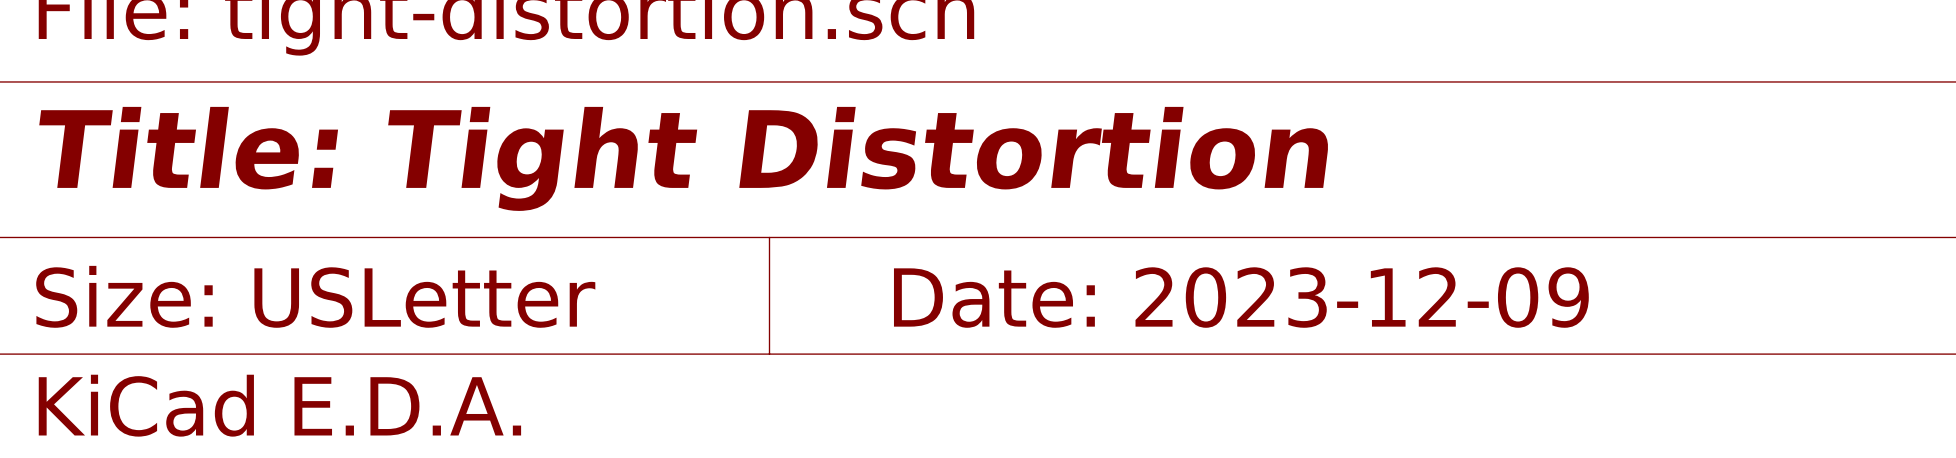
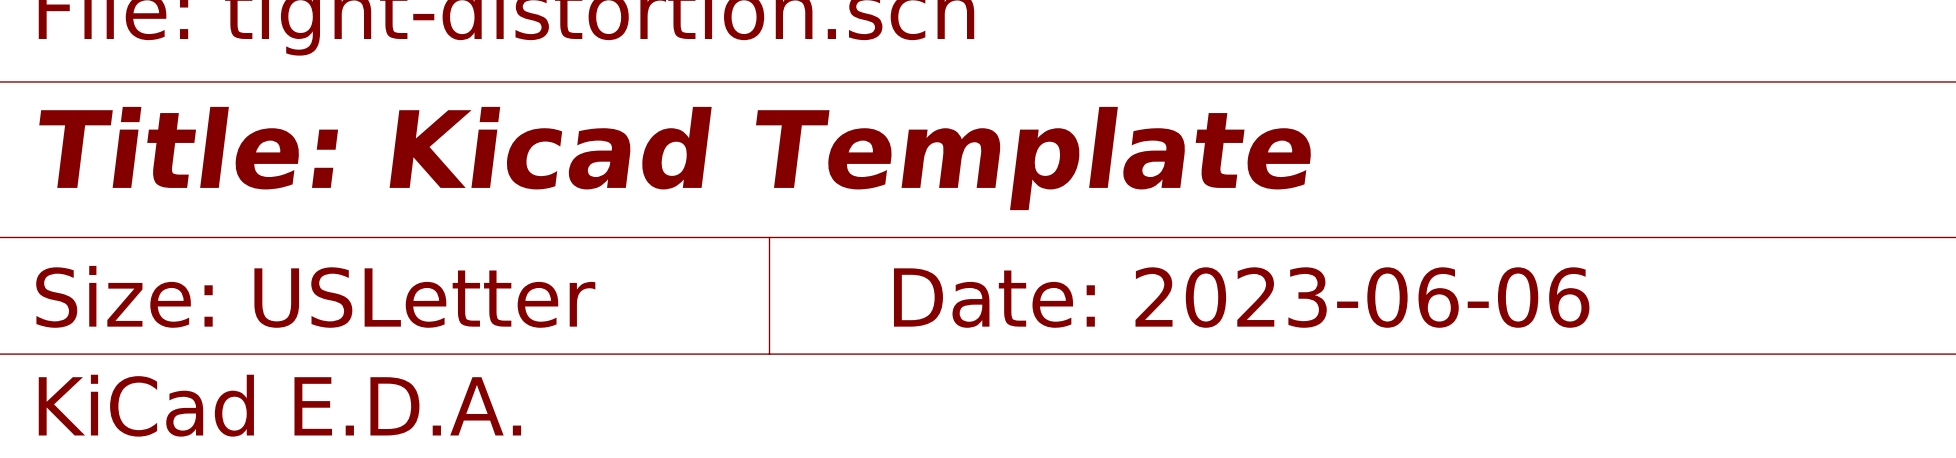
title block: Title: Tight Distortion (684, 158) -> Title: Kicad Template (675, 158)
title block: Date: 2023-12-09 (1241, 297) -> Date: 2023-06-06 (1241, 297)

